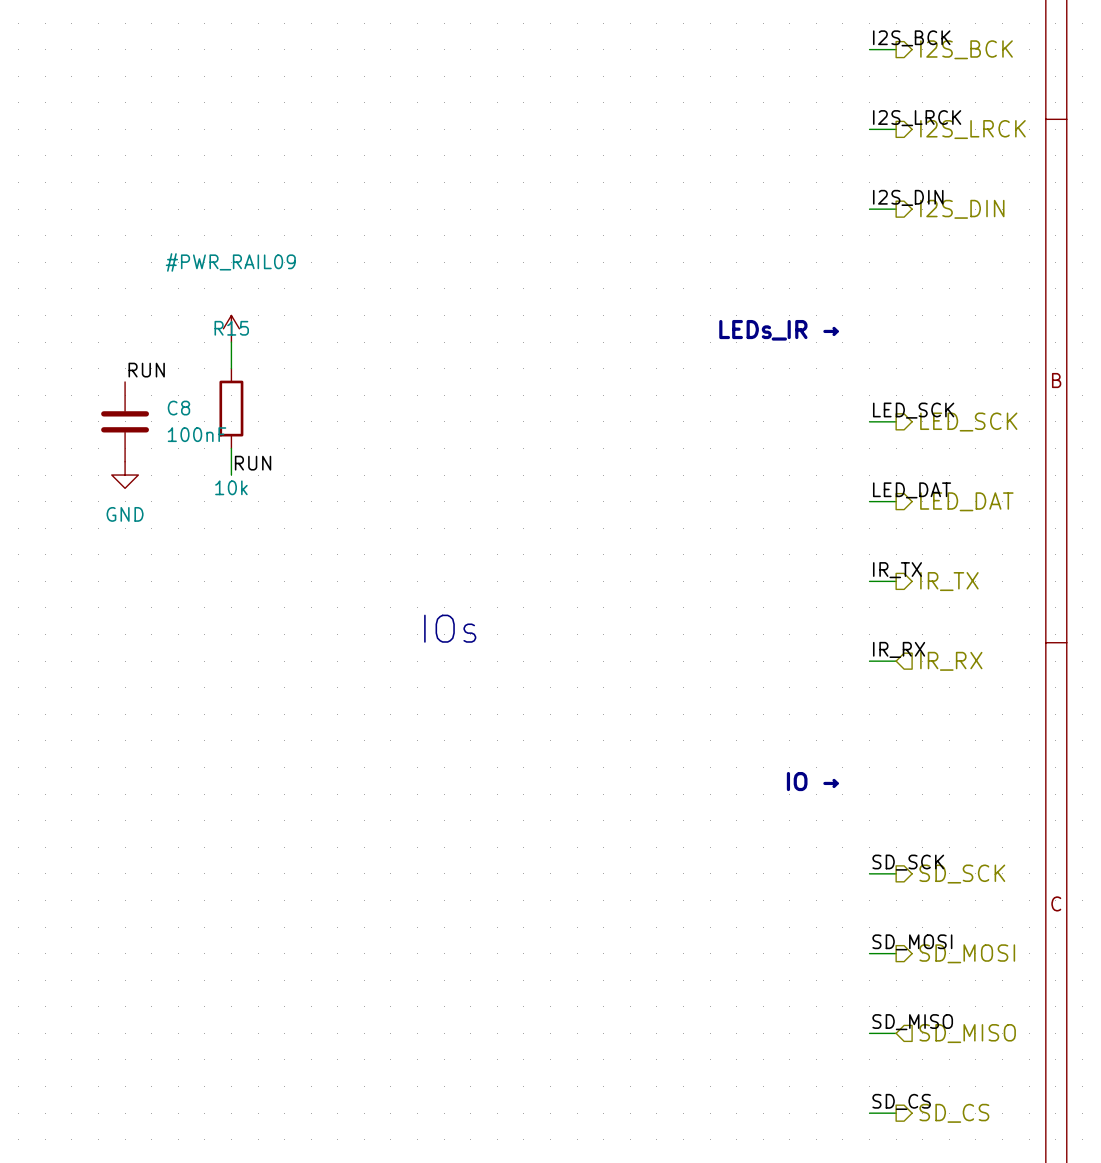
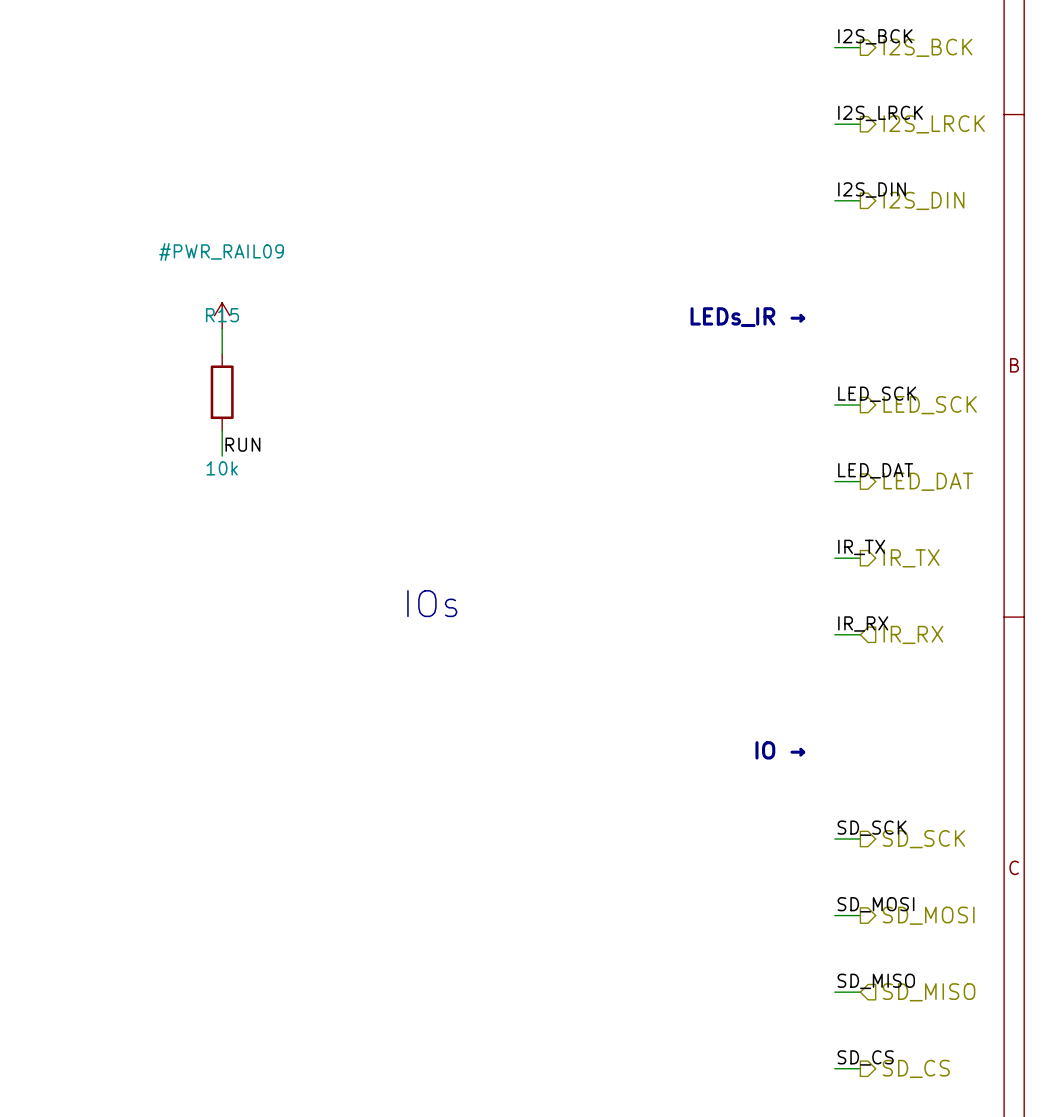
label: RUN (146, 370) -> none
C8: 100nF (125, 421) -> none
power symbol: GND (125, 475) -> none

